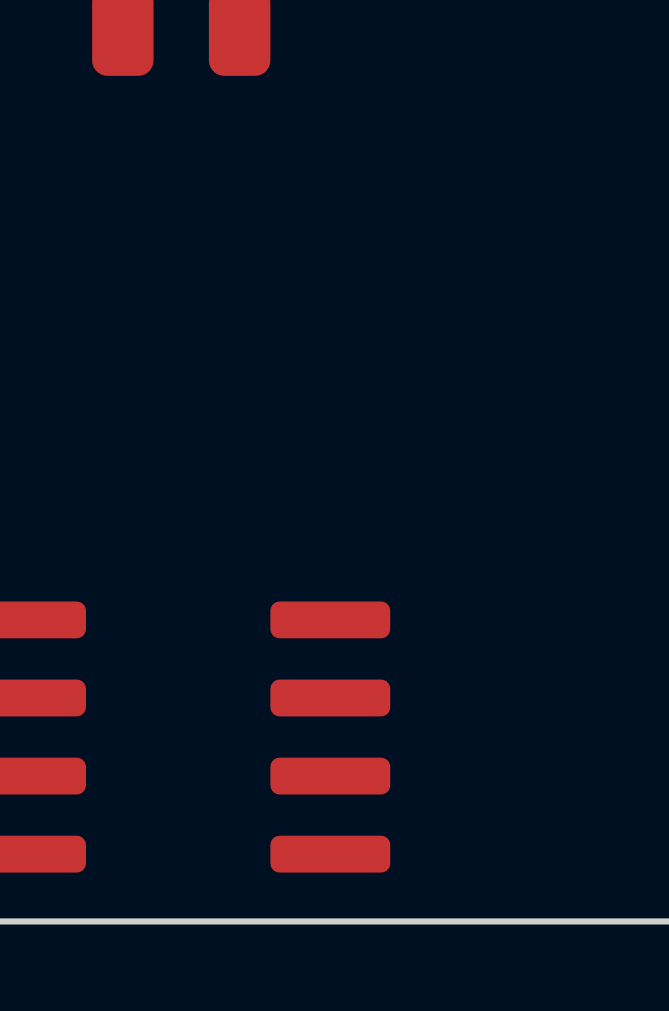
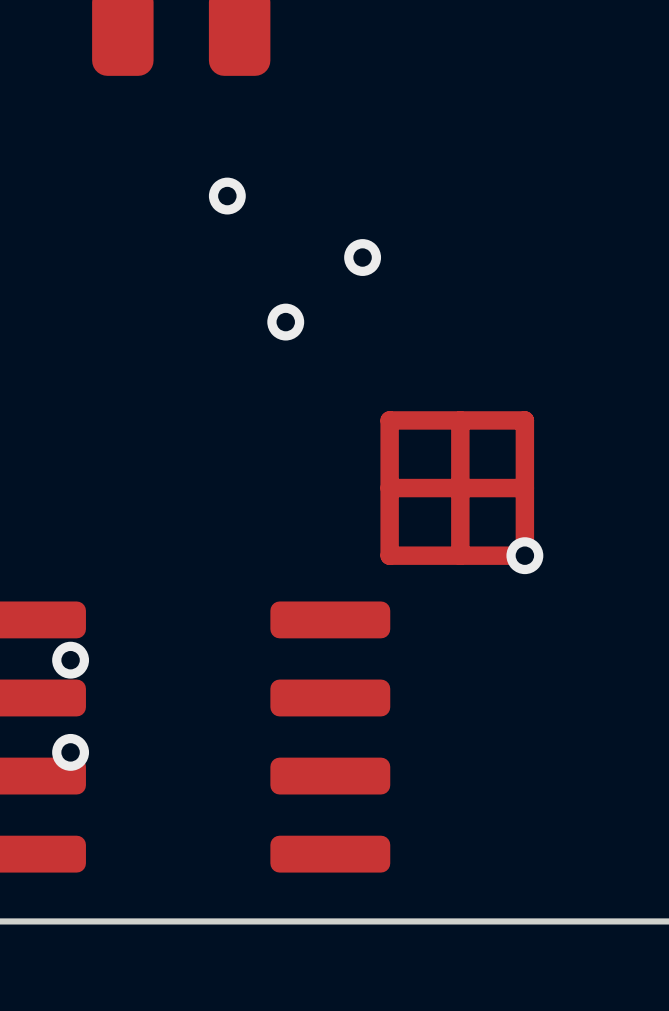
via: none -> (227, 196)
via: none -> (362, 257)
via: none -> (285, 322)
top track: none -> (460, 420) (460, 555)
top track: none -> (524, 420) (389, 420) (389, 555) (524, 555) (524, 420)
top track: none -> (524, 488) (389, 488)
via: none -> (524, 555)
via: none -> (70, 660)
via: none -> (70, 752)

